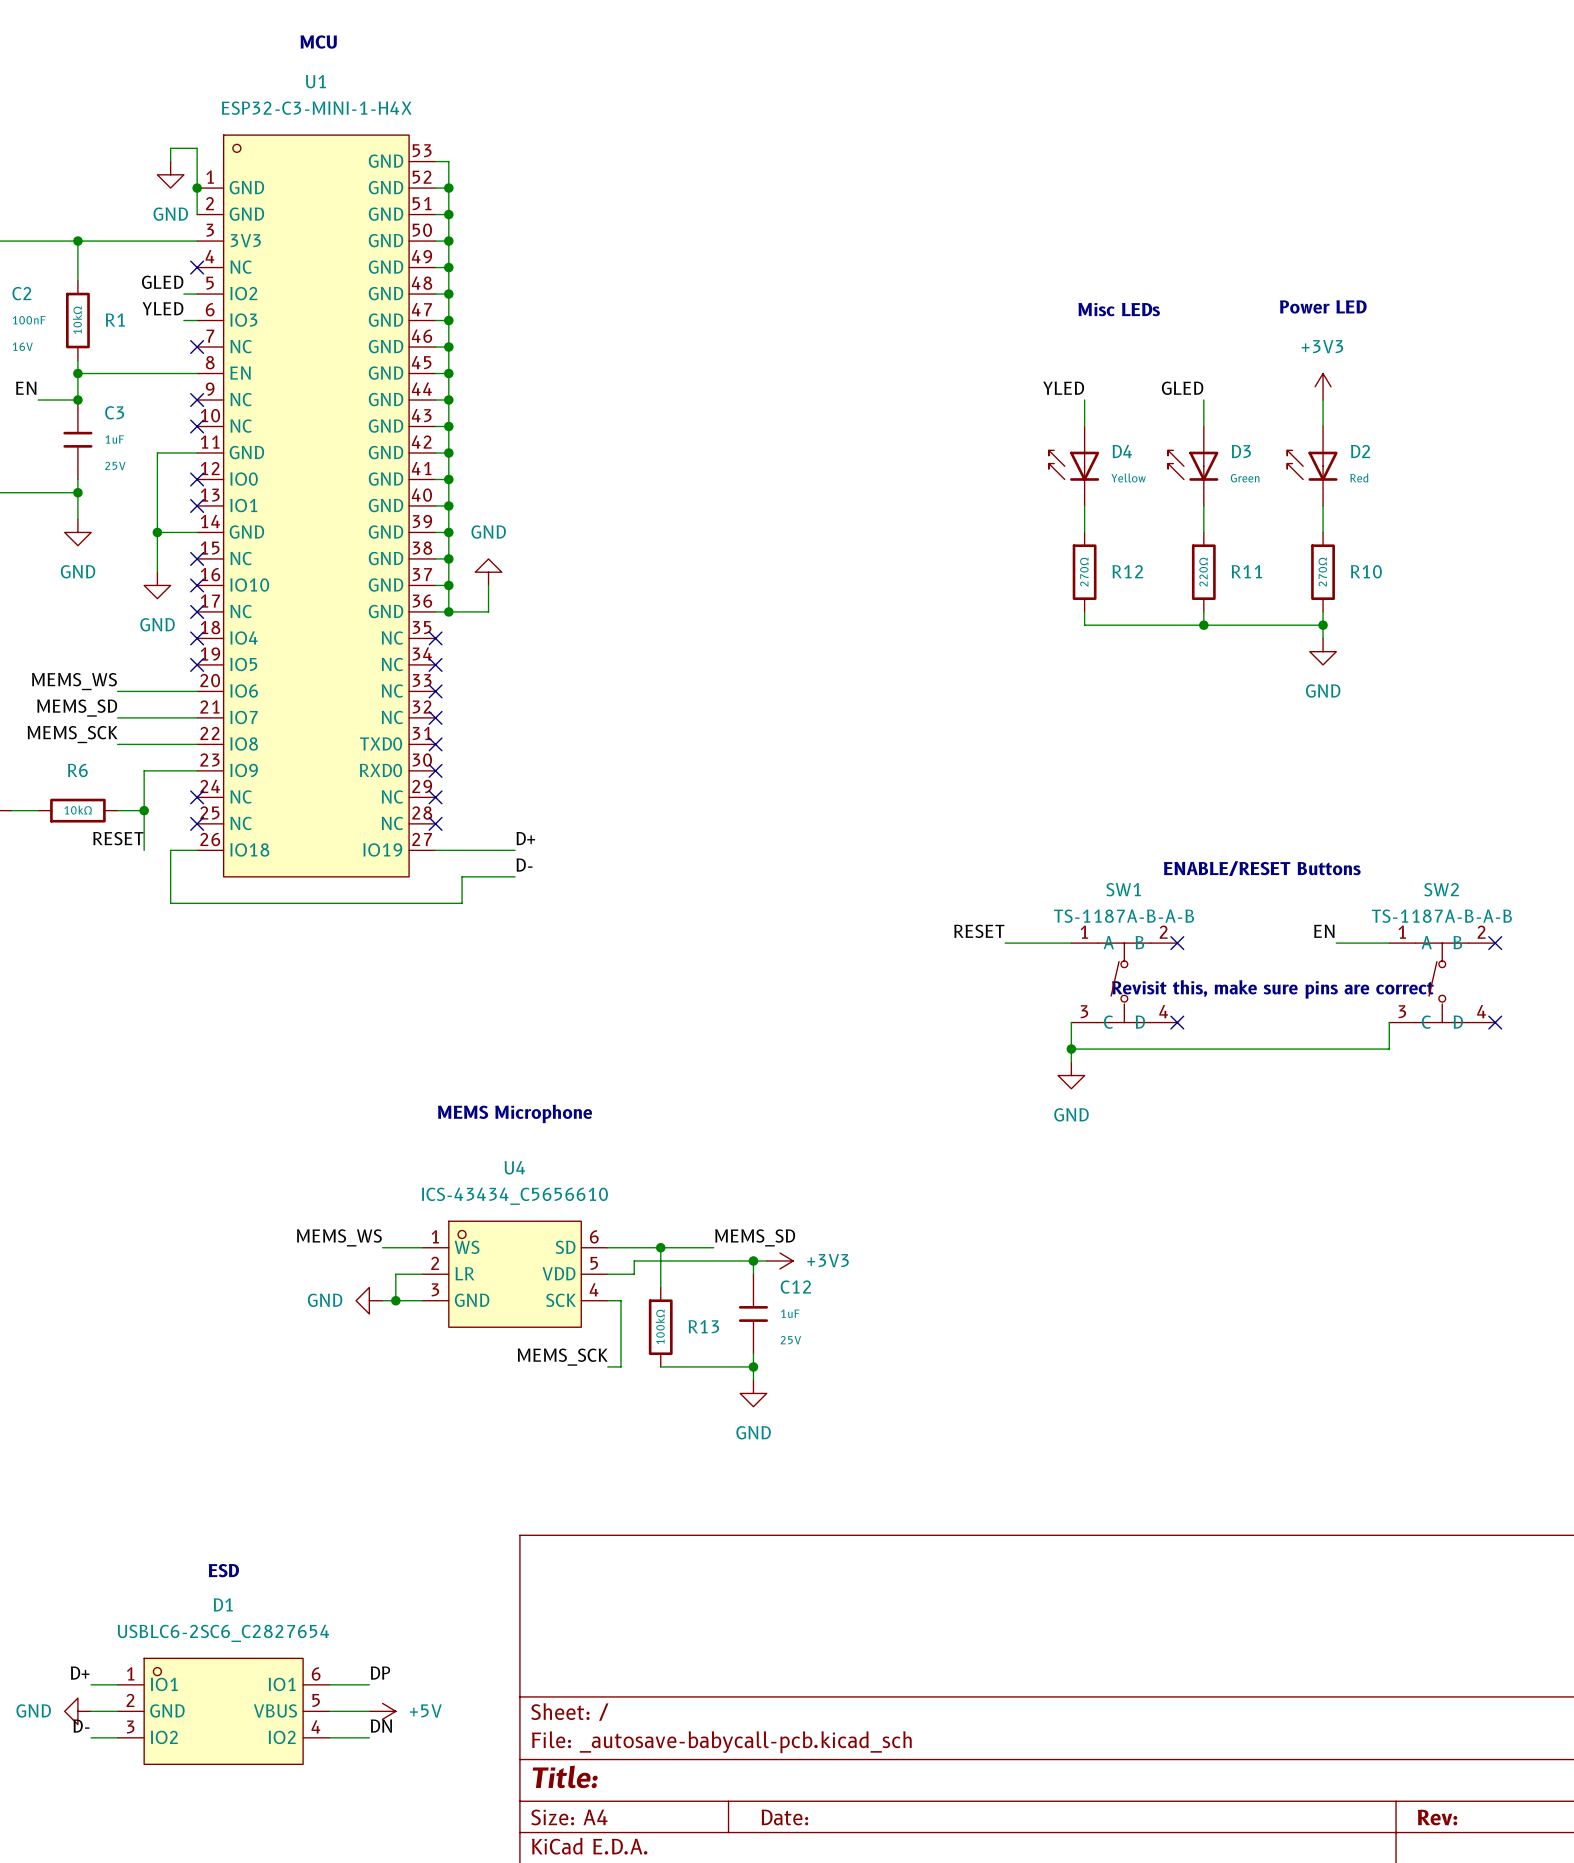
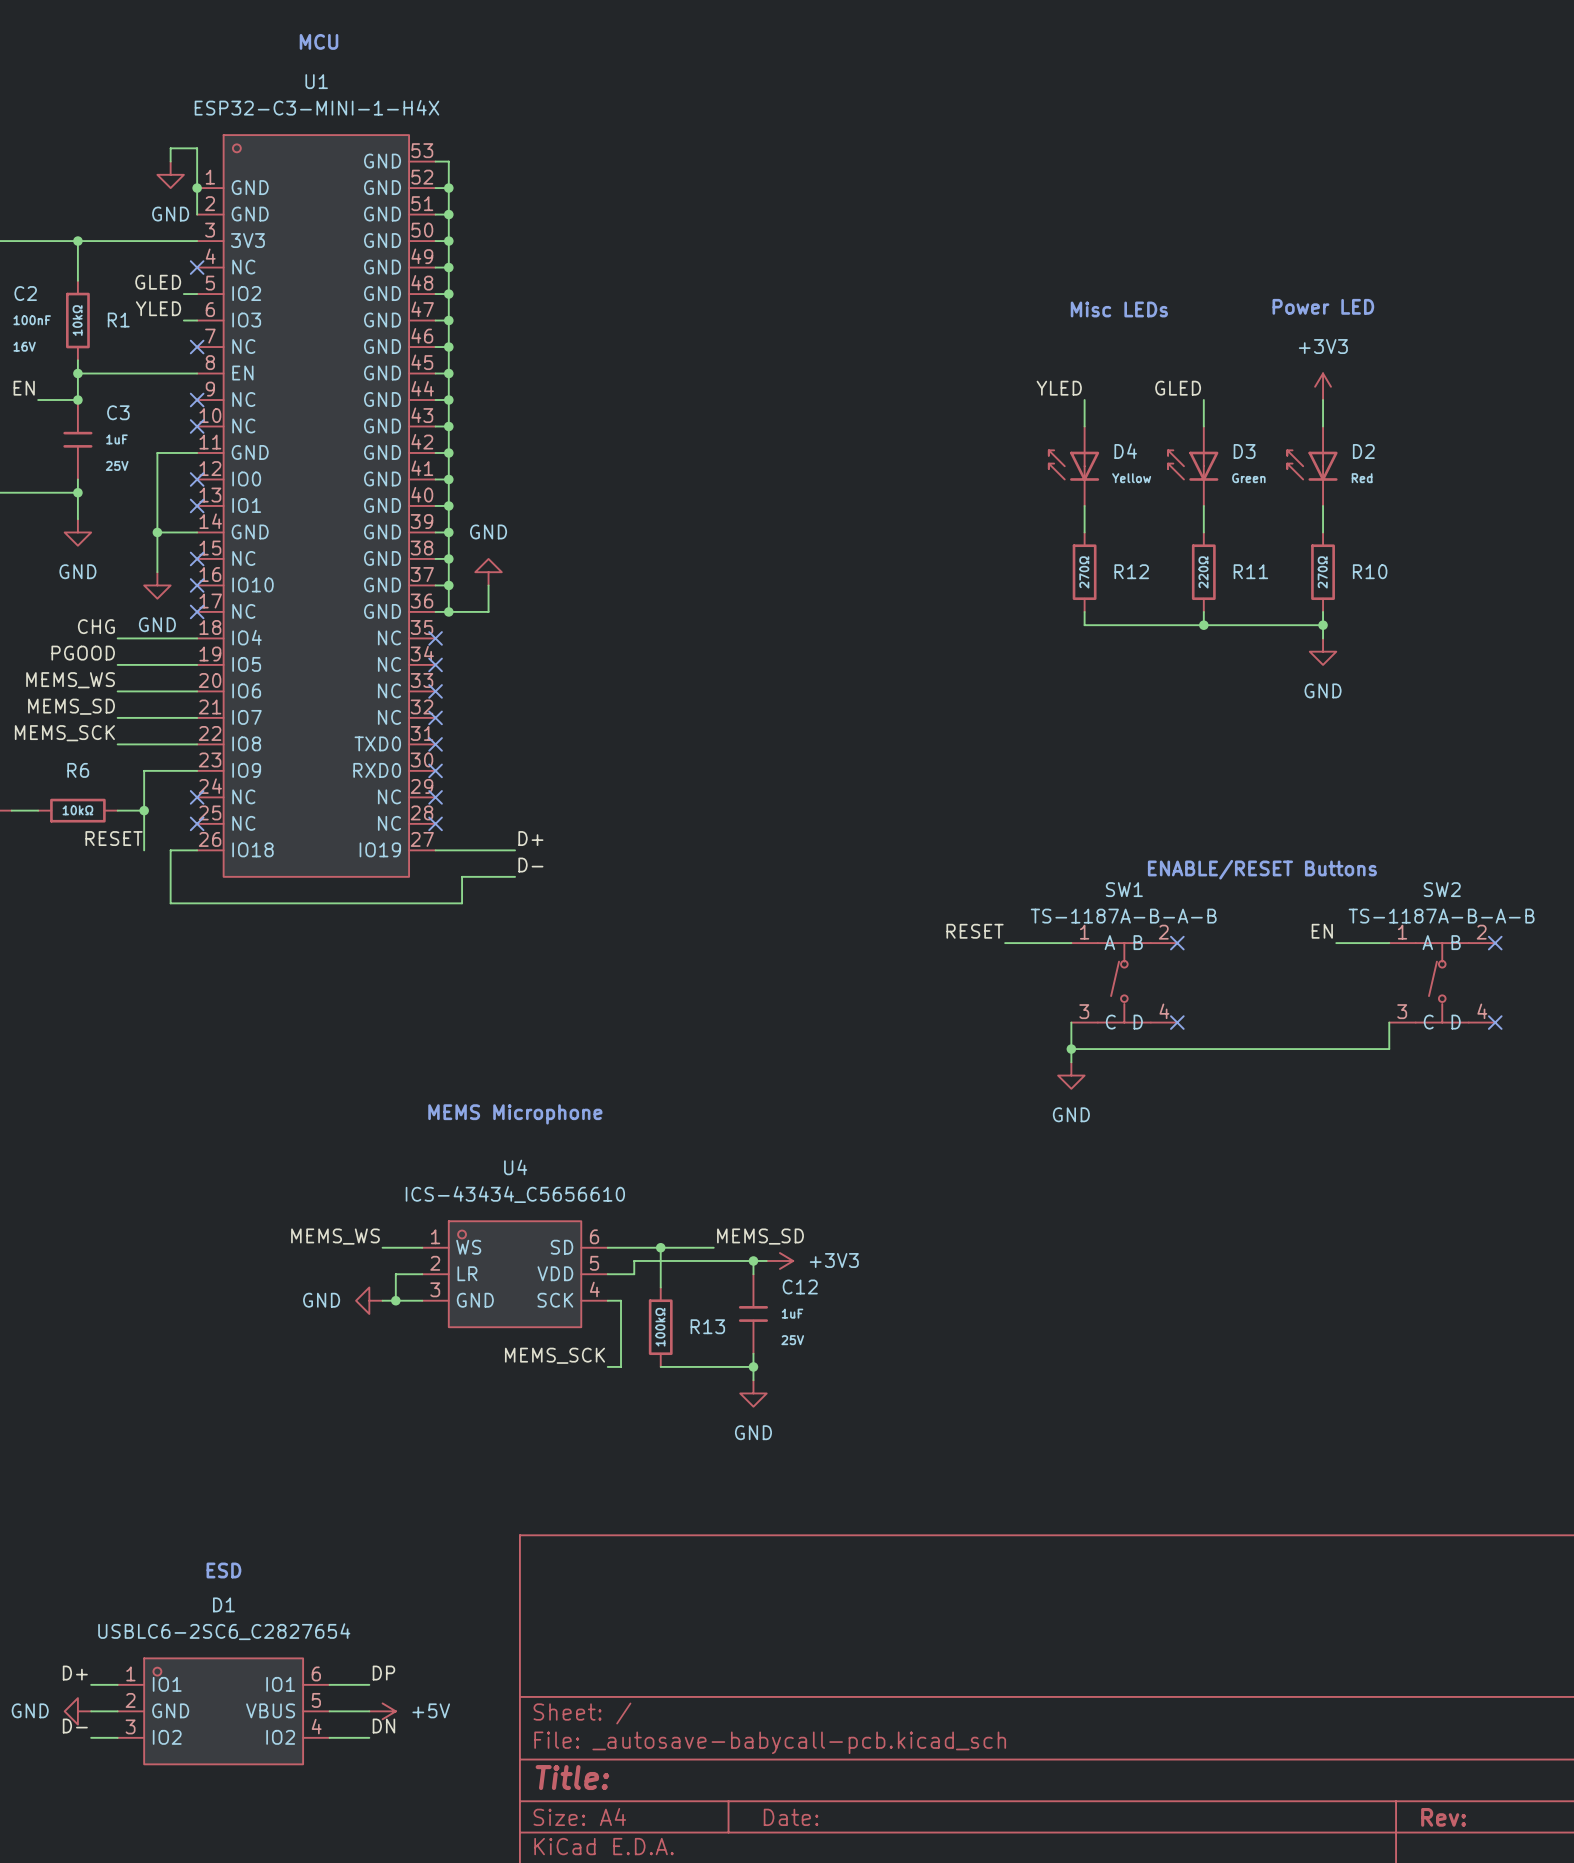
label: none -> CHG (96, 626)
wire: none -> (117, 638) (197, 638)
no-connect mark: (197, 638) -> none
label: none -> PGOOD (83, 653)
wire: none -> (117, 664) (197, 664)
no-connect mark: (197, 664) -> none
text: Revisit this, make sure pins are correct (1272, 989) -> none

